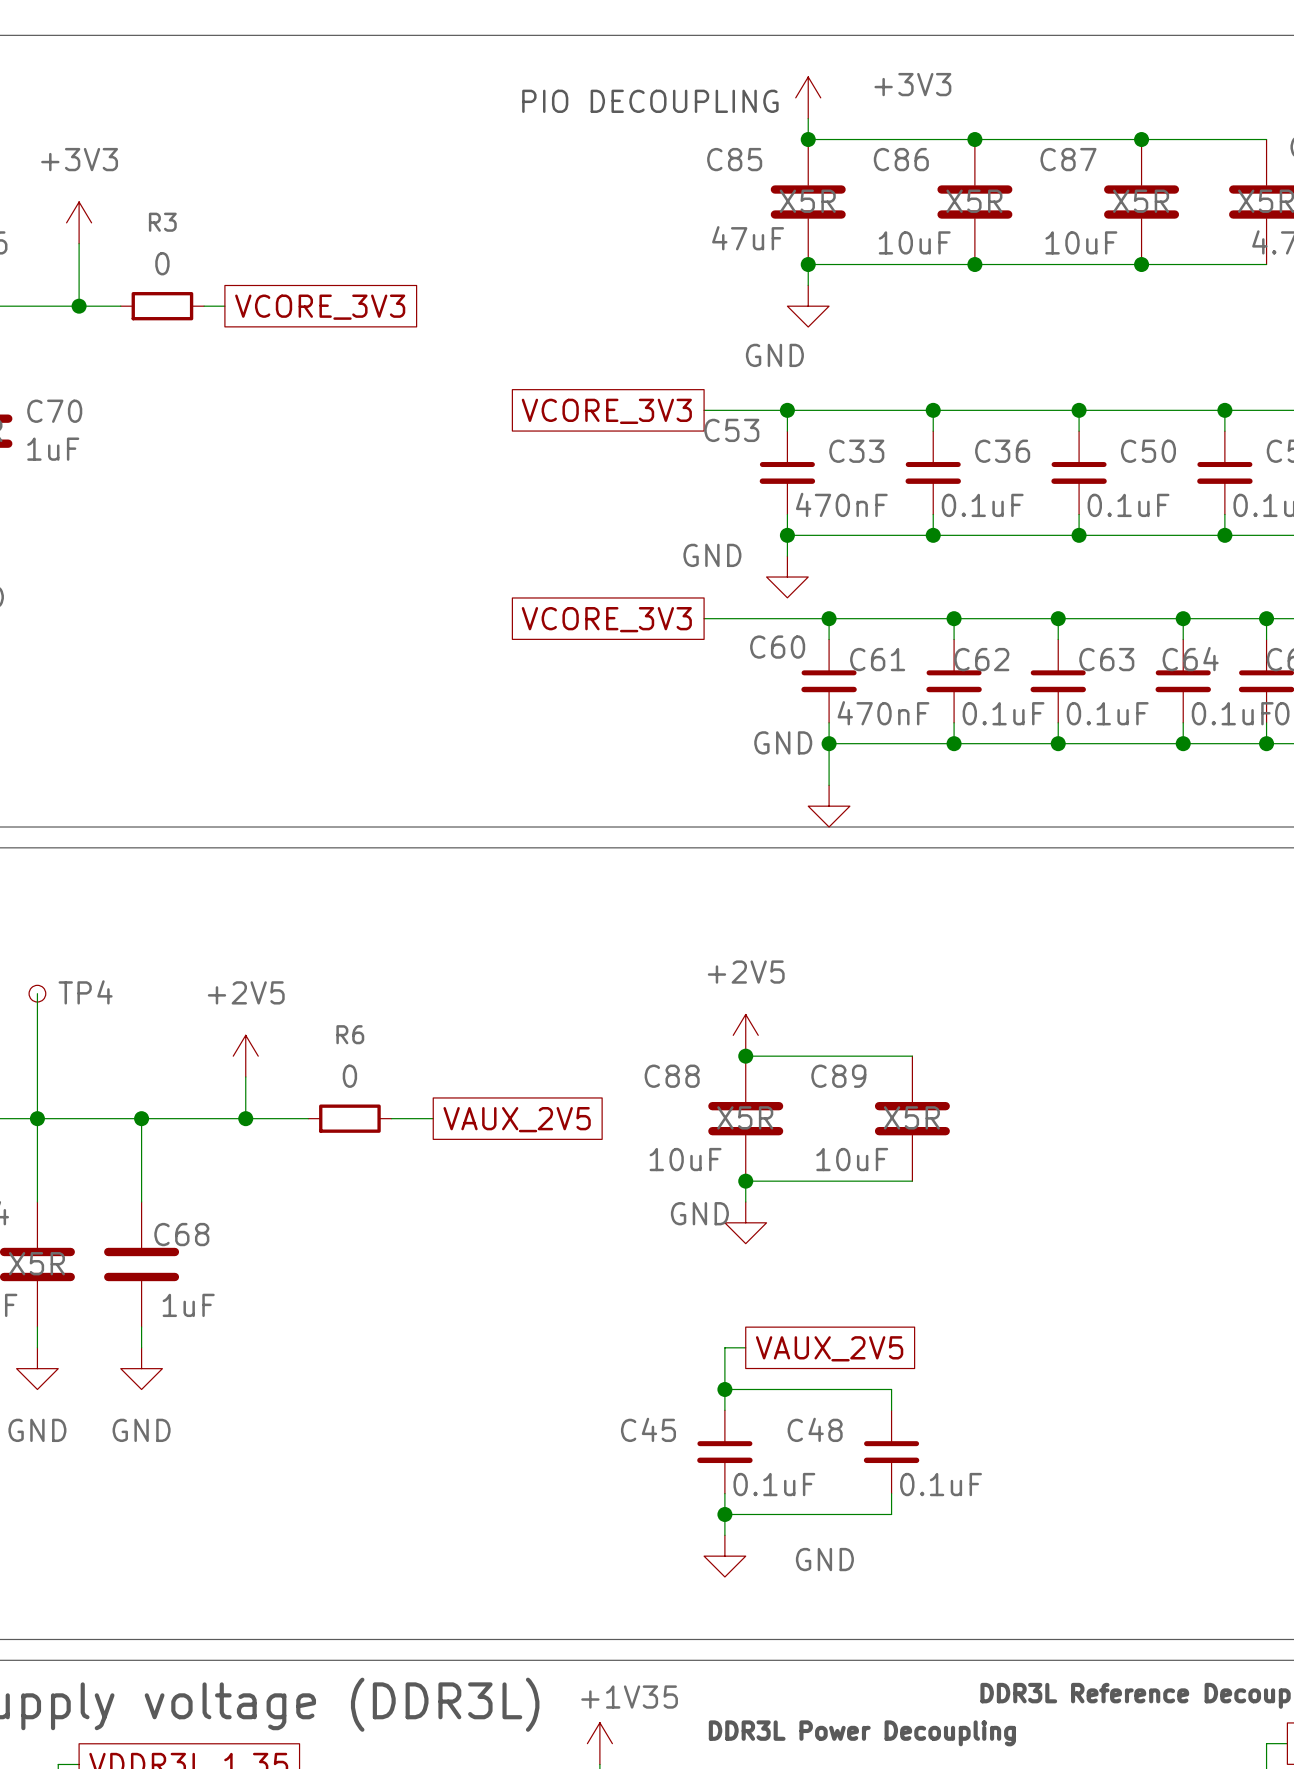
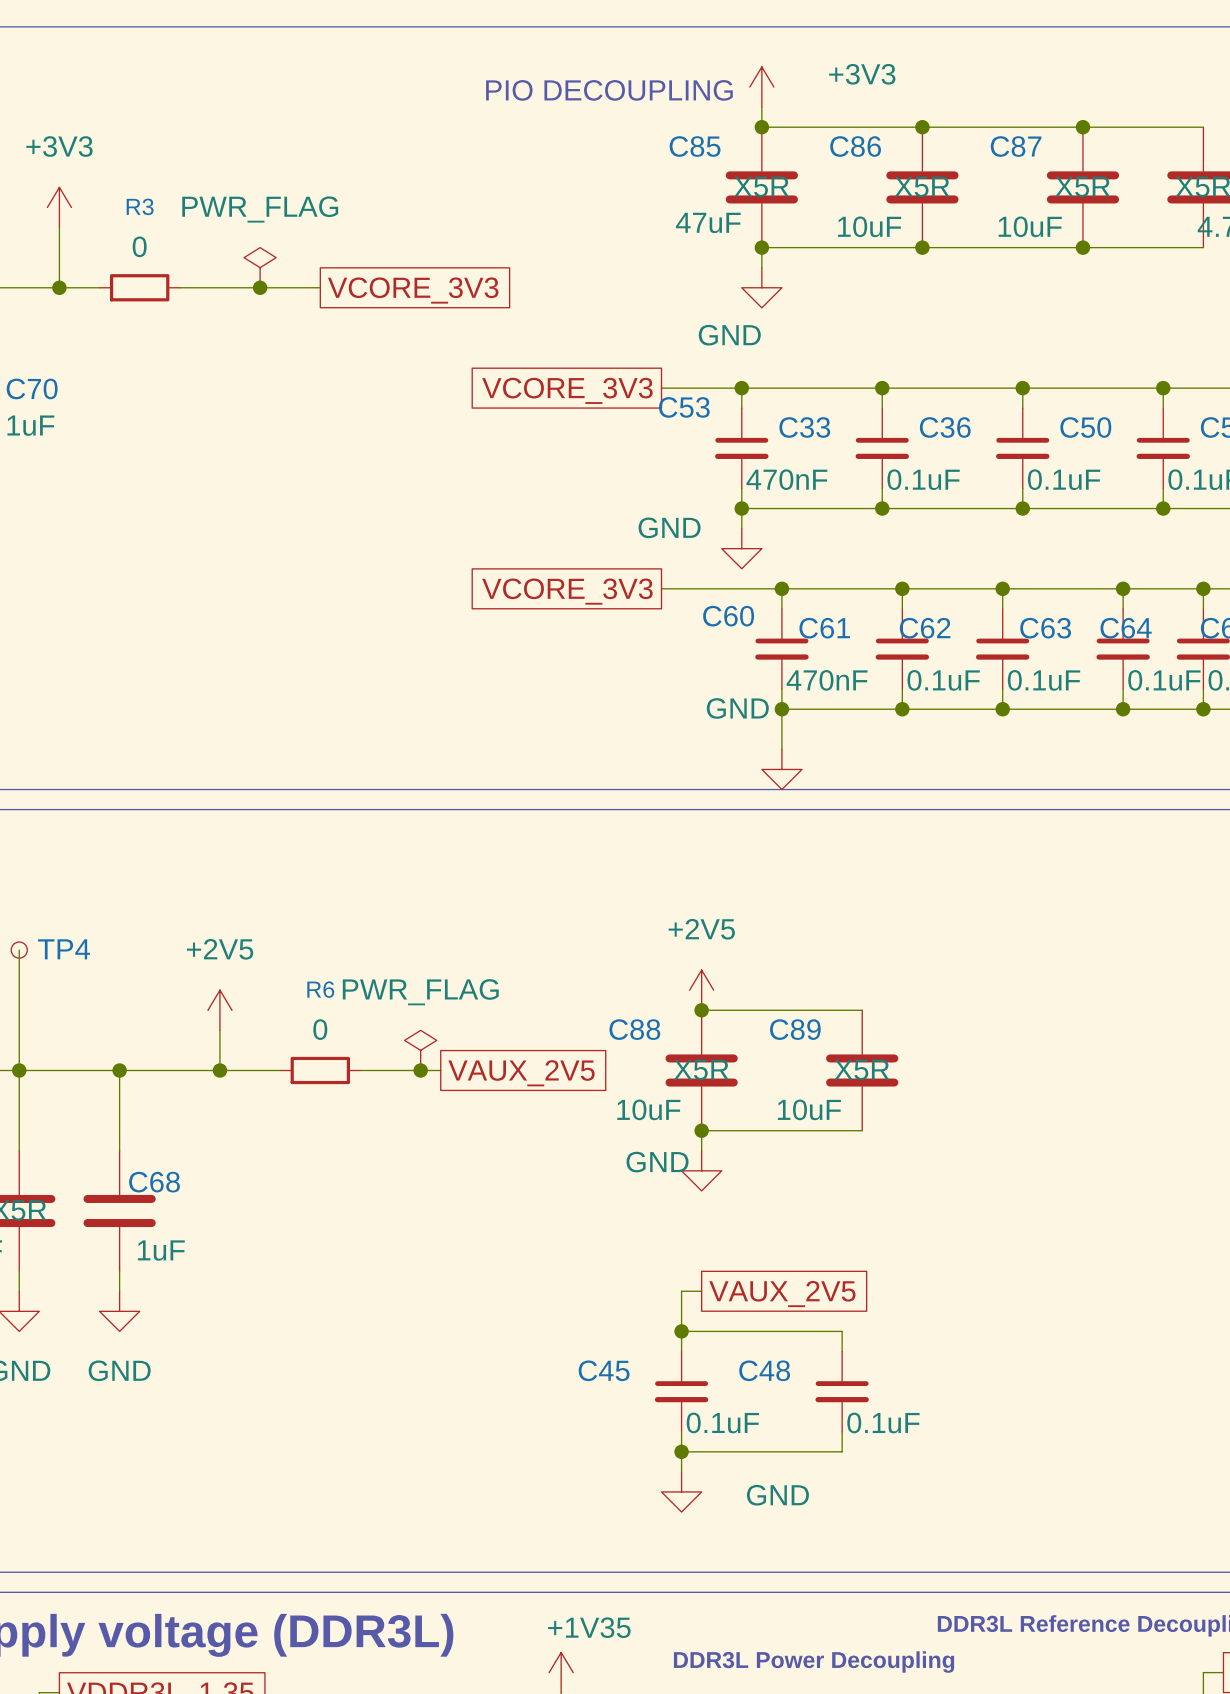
power symbol: none -> PWR_FLAG (260, 267)
wire: none -> (199, 287) (320, 287)
junction: none -> (260, 287)
global label position: VCORE_3V3 (320, 307) -> VCORE_3V3 (413, 290)
power symbol: none -> PWR_FLAG (420, 1050)
wire: none -> (400, 1070) (440, 1070)
junction: none -> (420, 1070)
global label position: VAUX_2V5 (517, 1119) -> VAUX_2V5 (521, 1073)

